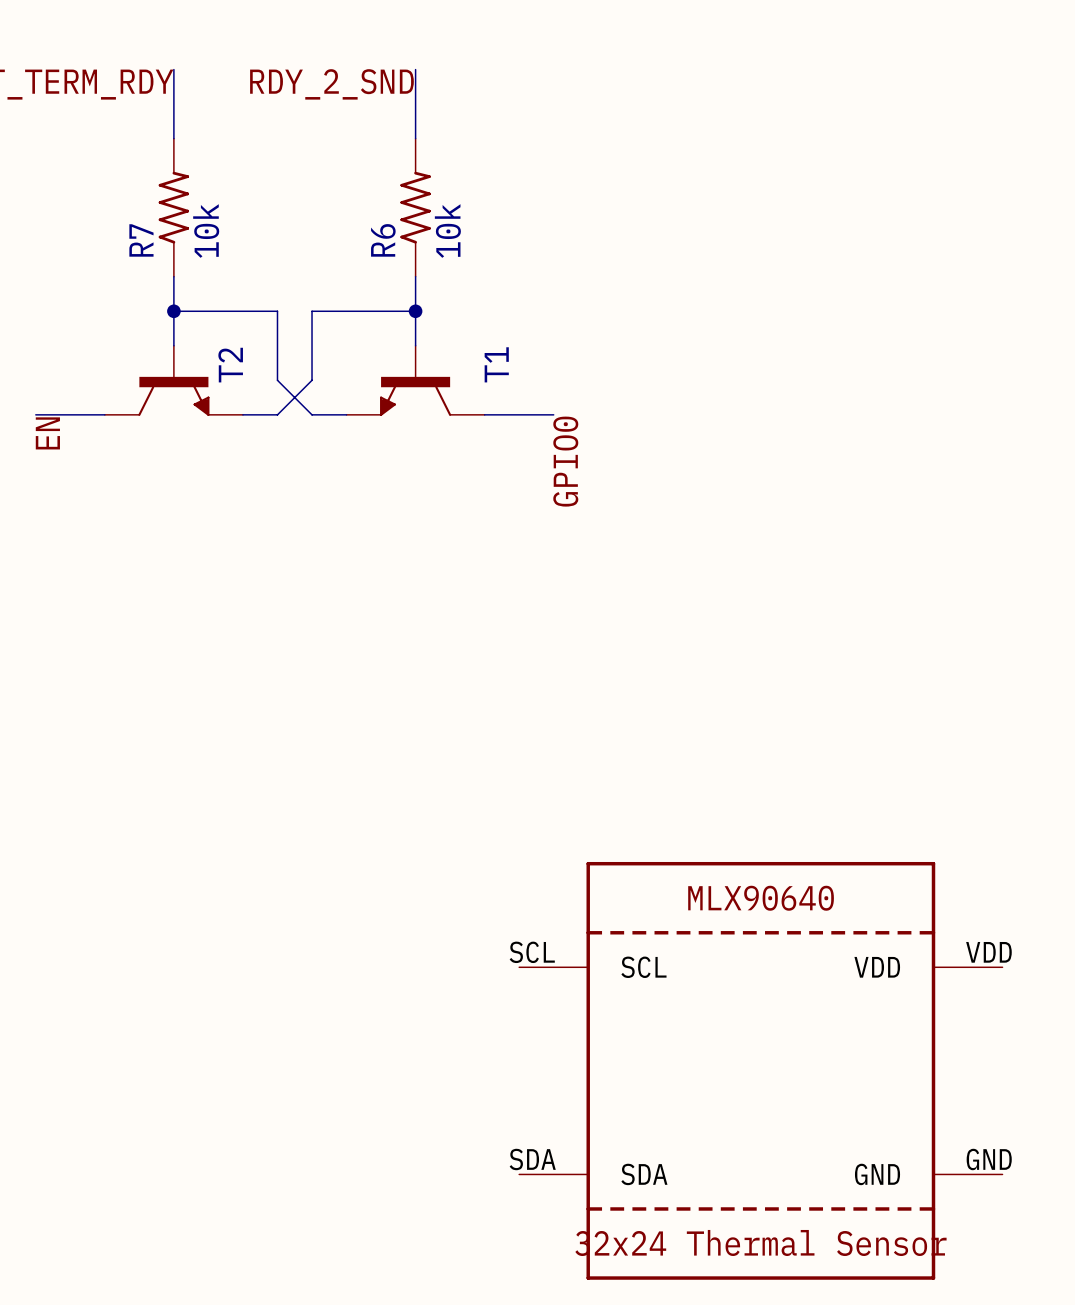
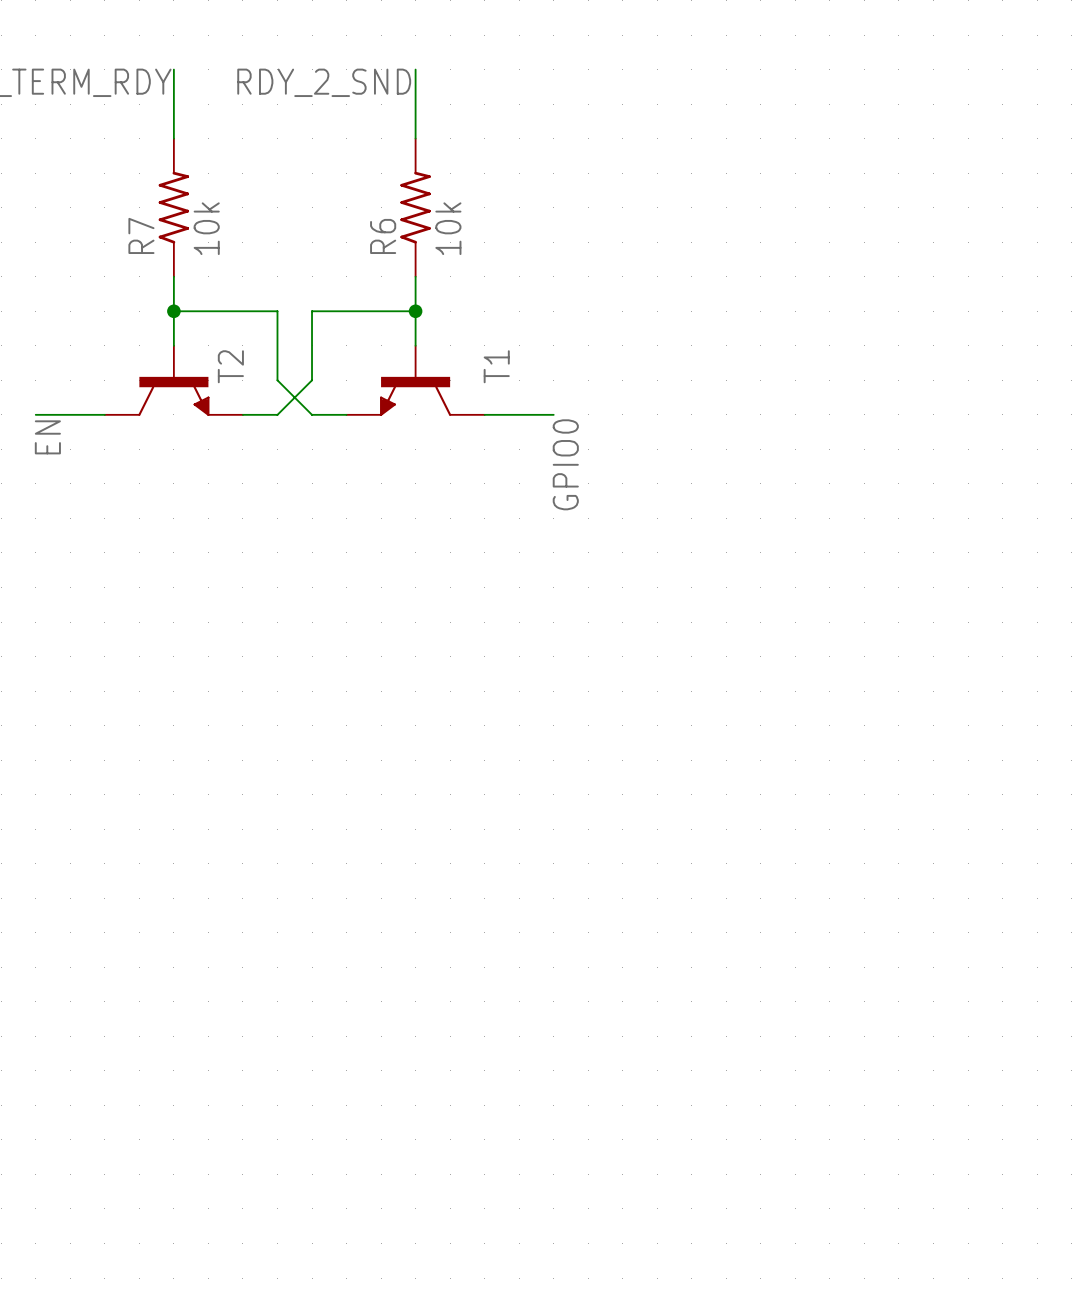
part: (760, 1070) -> none

